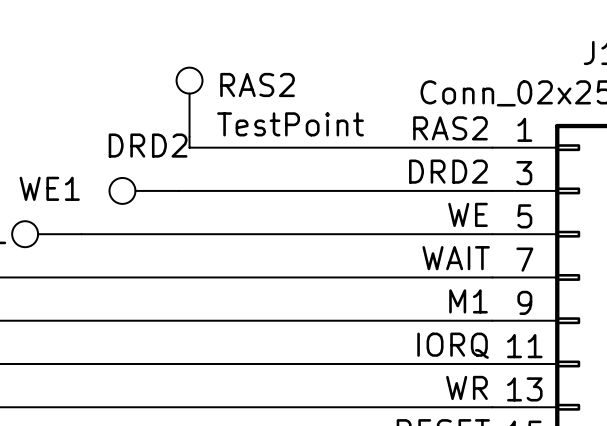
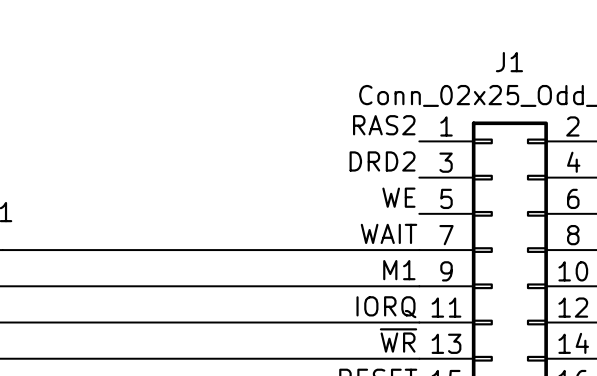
RAS2: TestPoint (189, 102) -> none
wire: (189, 136) (189, 147) (492, 147) -> none
DRD2: (144, 190) -> none
wire: (178, 190) (492, 190) -> none
WE1: (46, 234) -> none
wire: (81, 234) (492, 234) -> none
label: WR (466, 387) -> ~{WR} (398, 340)

